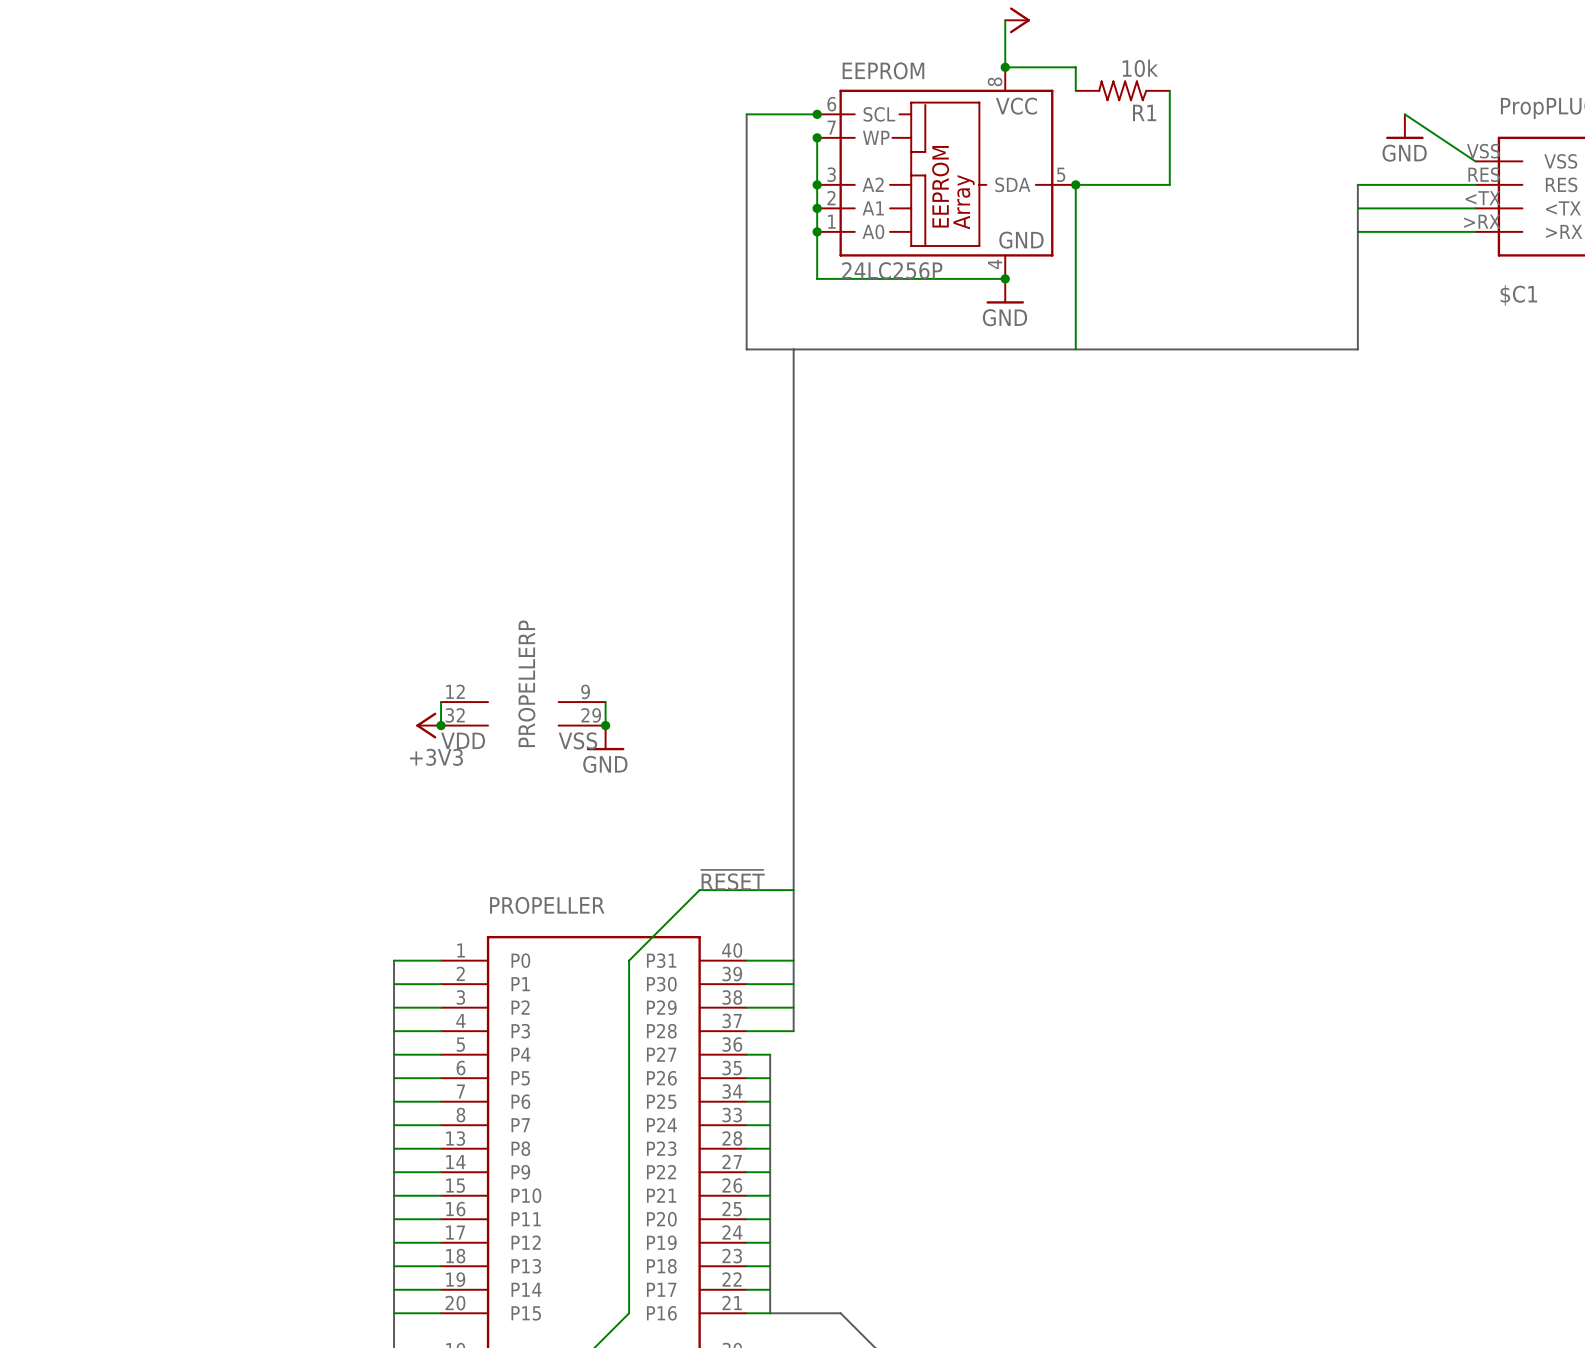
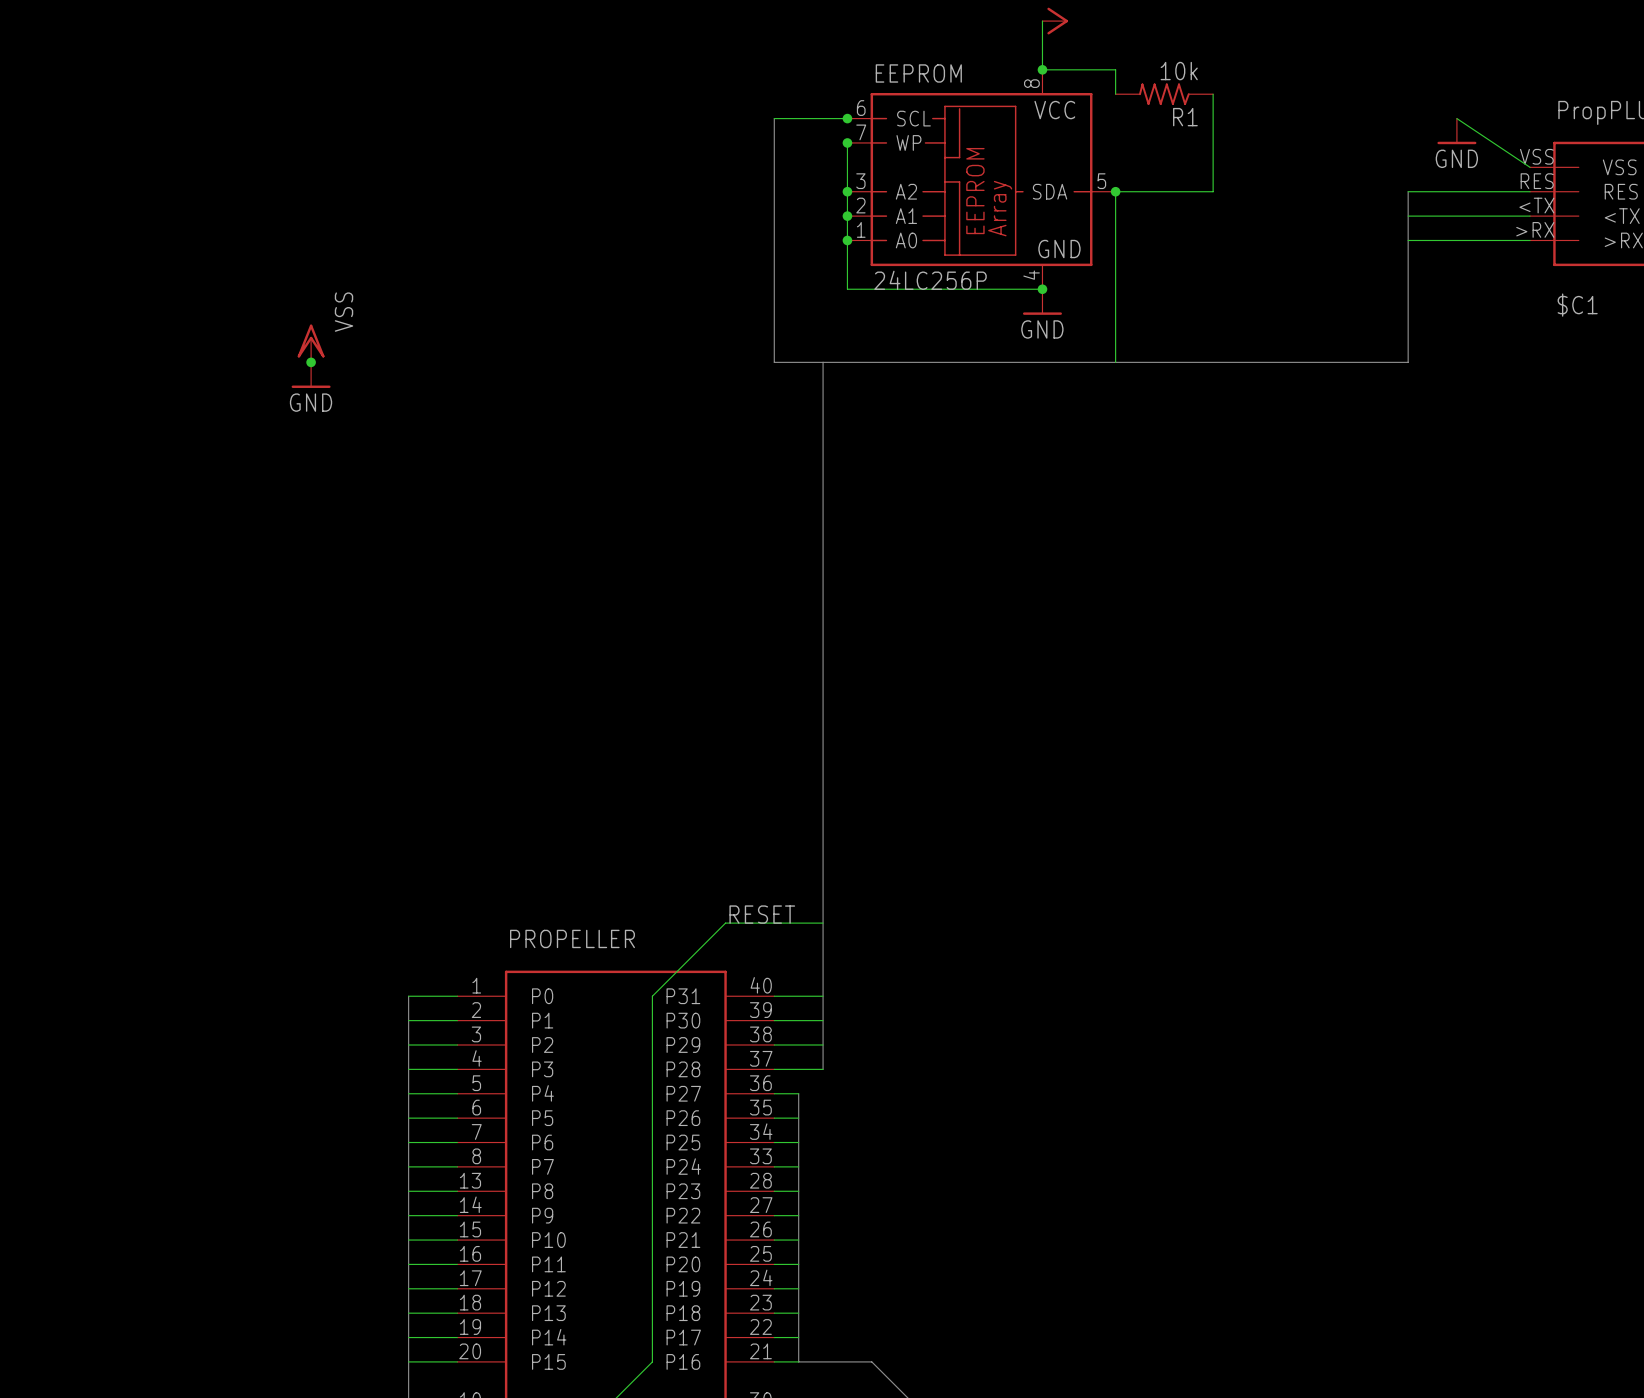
power symbol: none -> VSS (311, 343)
junction: none -> (311, 362)
power symbol: none -> GND (311, 375)
wire: (441, 702) (441, 725) -> none
wire: (605, 702) (605, 725) -> none
PROPELLERP: (523, 713) -> none
power symbol: +3V3 (428, 725) -> none
junction: (441, 725) -> none
junction: (605, 725) -> none
power symbol: GND (605, 737) -> none
label: ~{RESET} (732, 880) -> RESET (762, 914)

